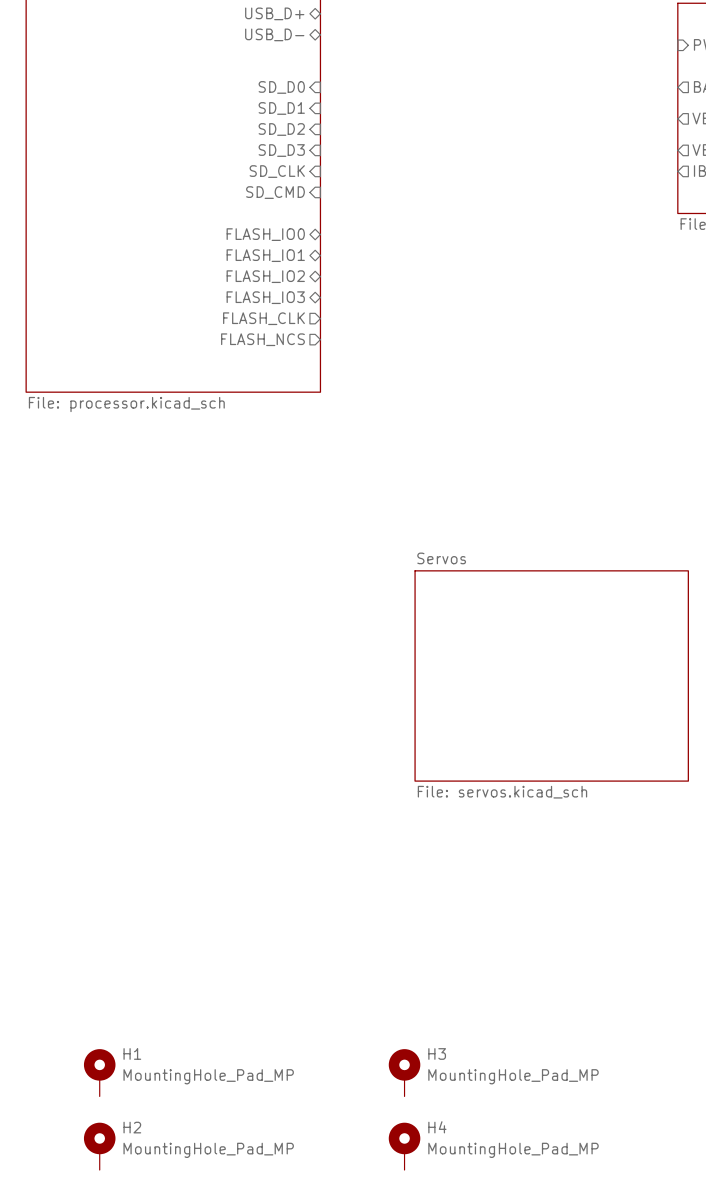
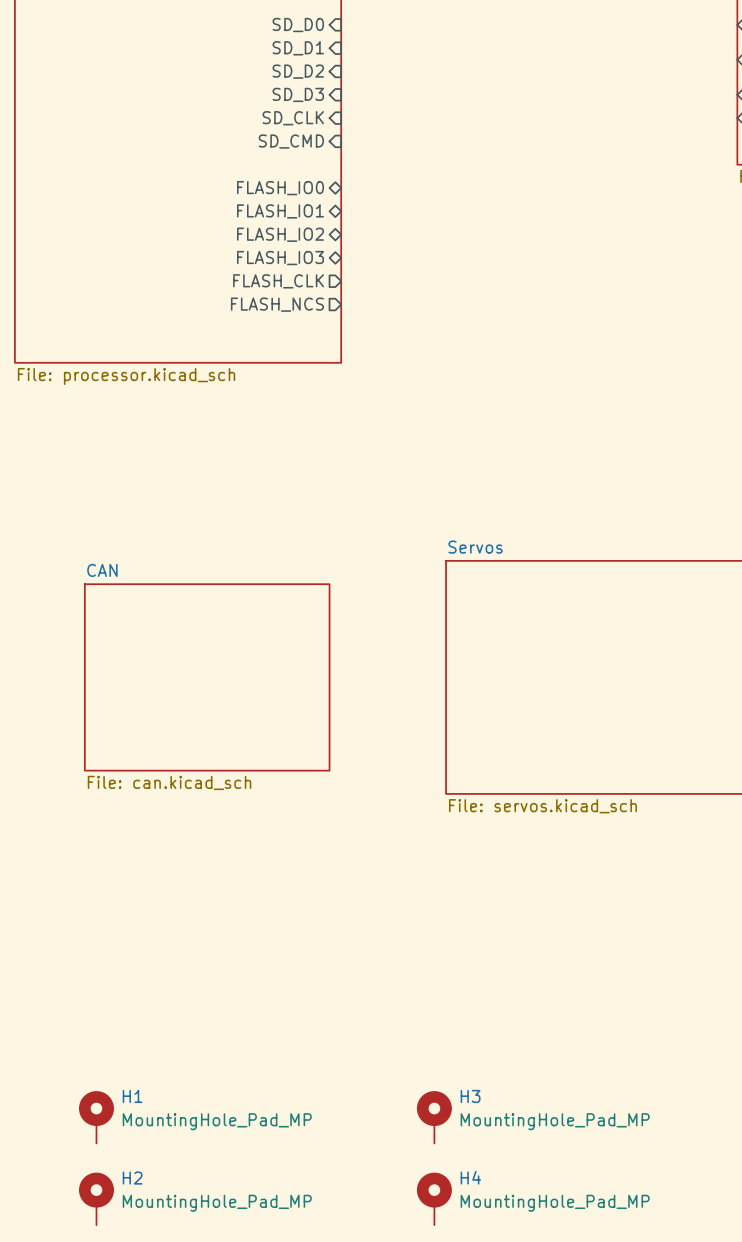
sheet CAN: none -> File: can.kicad_sch (207, 677)

